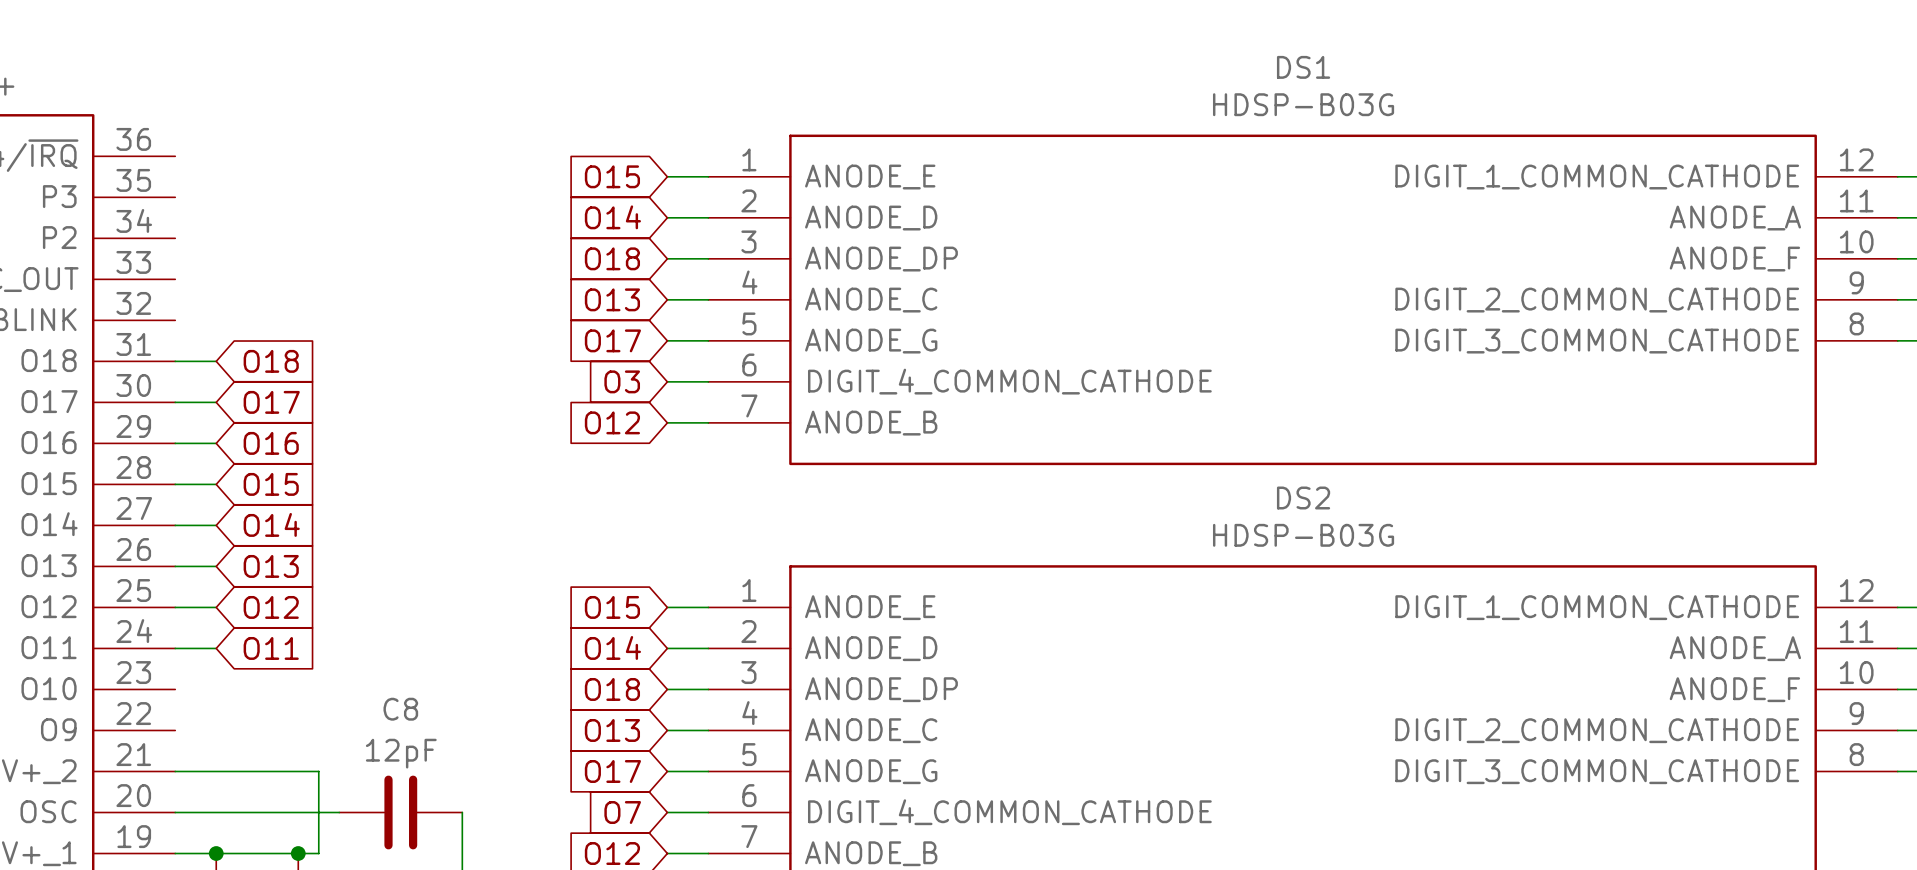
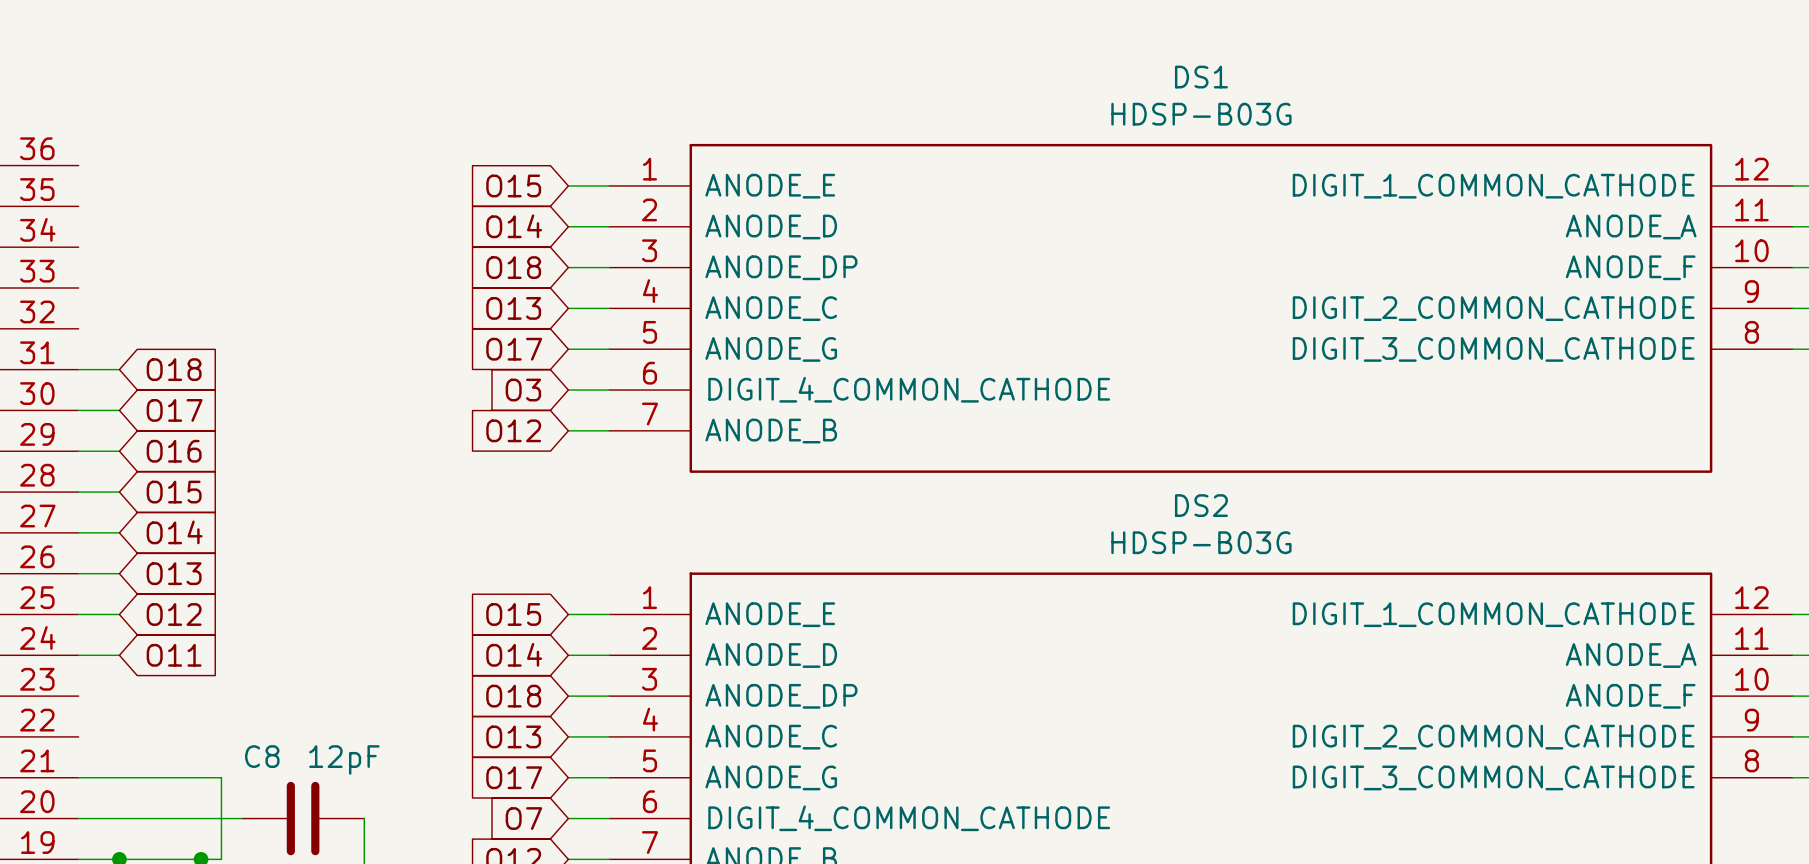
C8 name position: C8 (400, 709) -> C8 (262, 756)
C8 value position: 12pF (401, 753) -> 12pF (344, 759)

